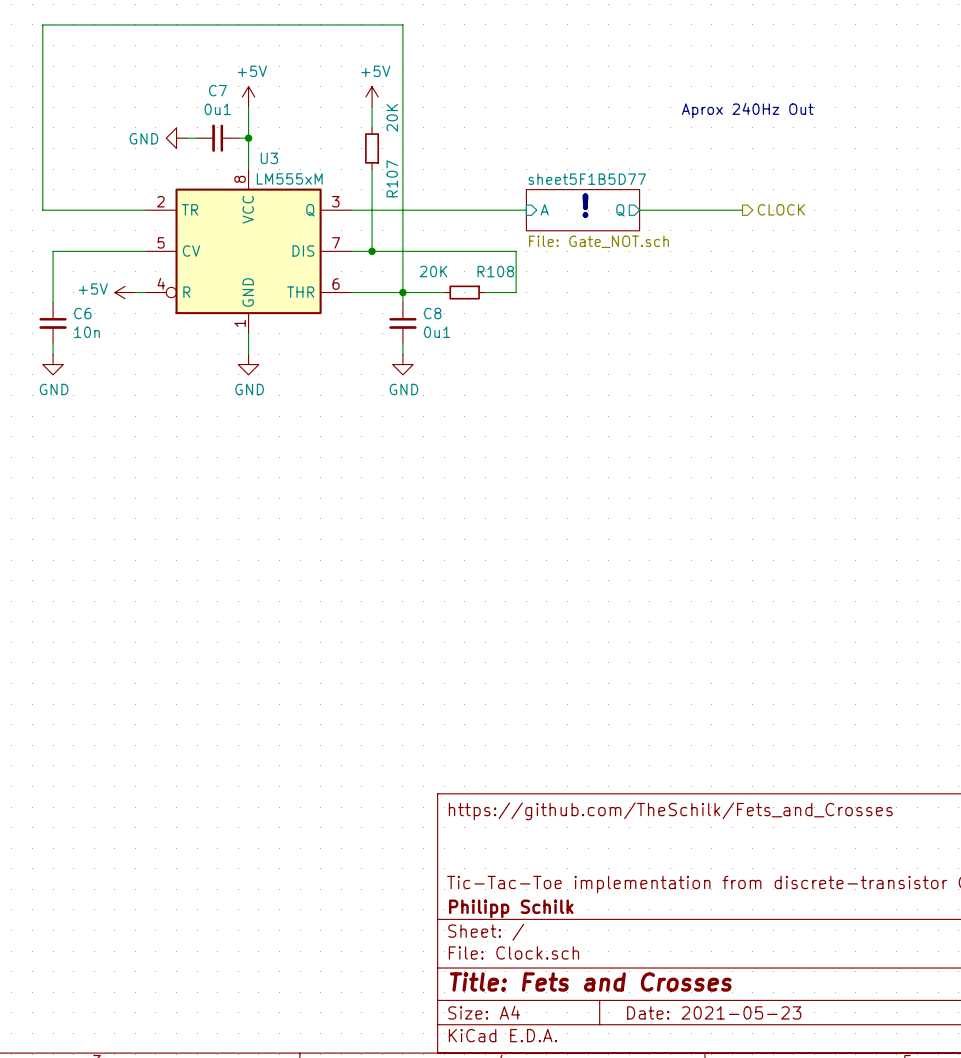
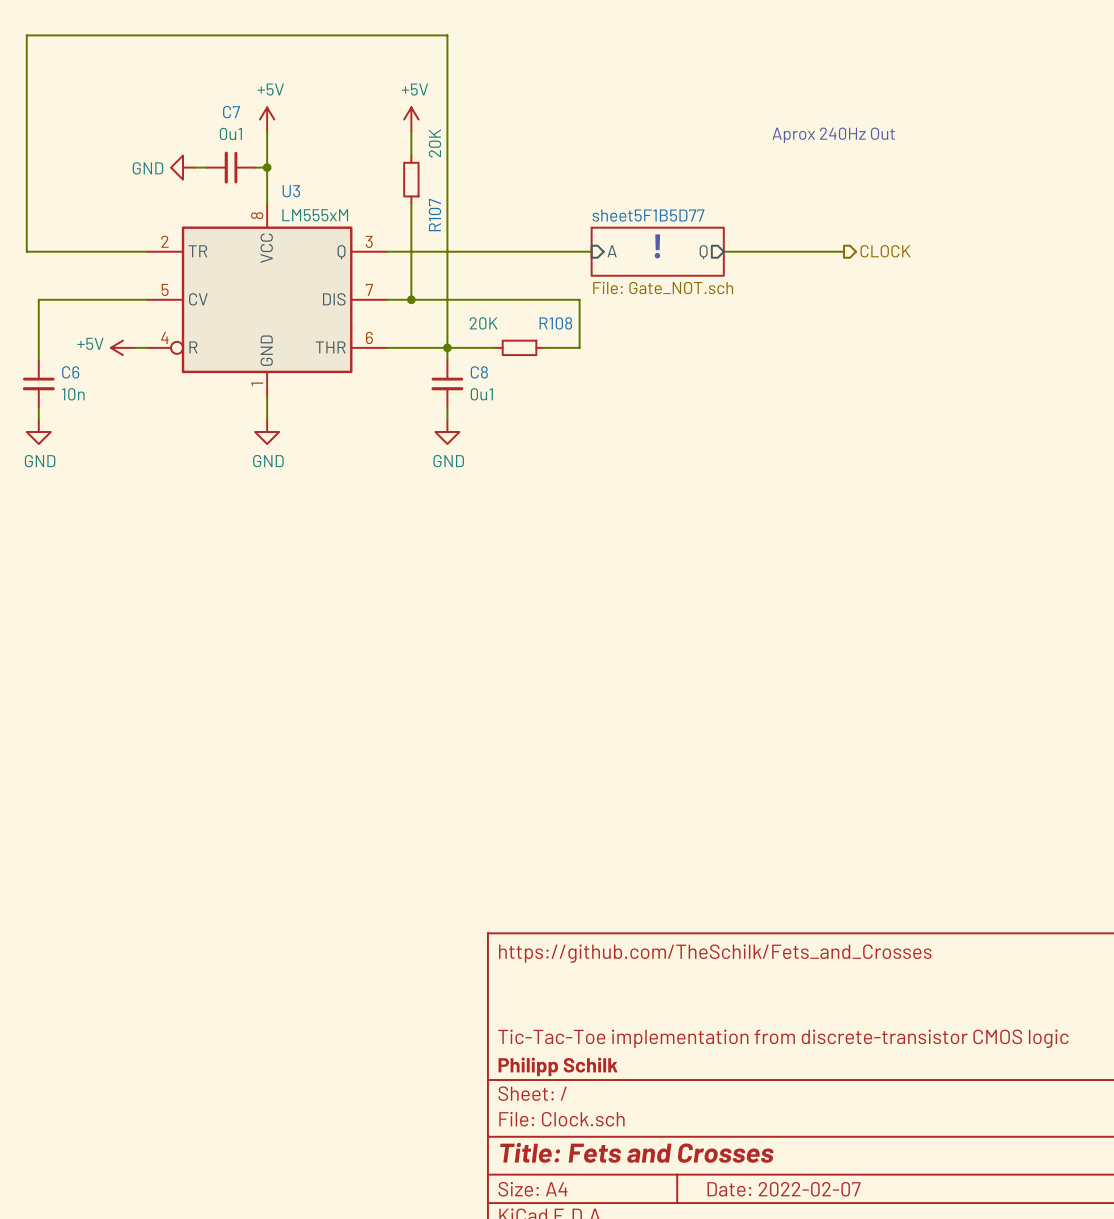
title block: Date: 2021-05-23 (714, 1012) -> Date: 2022-02-07 (784, 1189)

